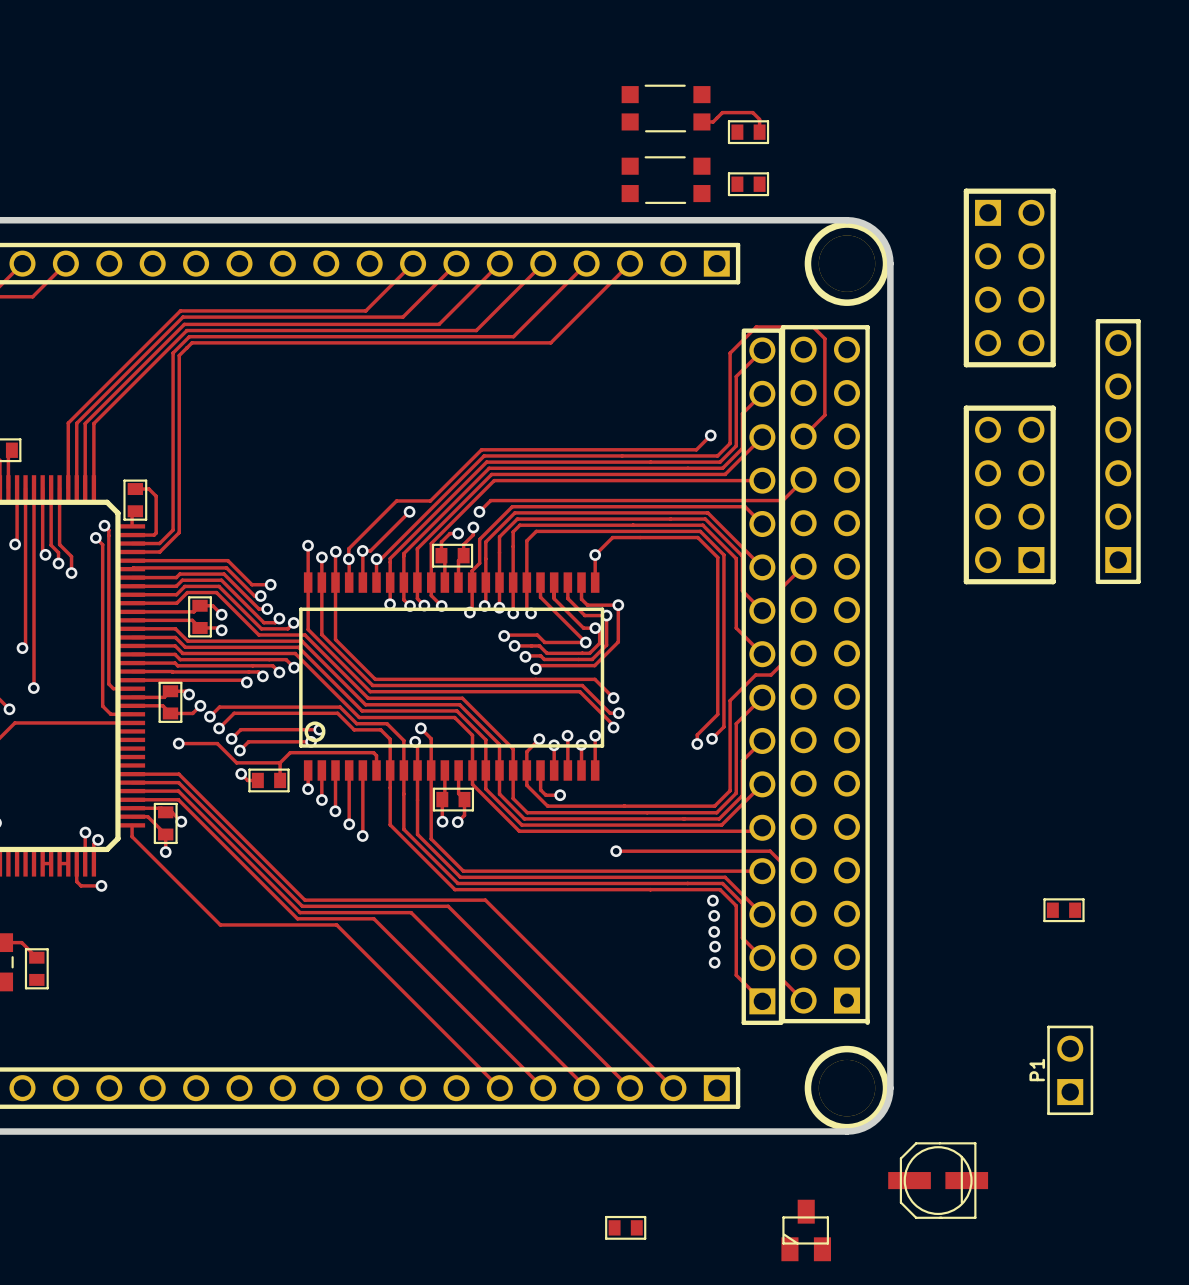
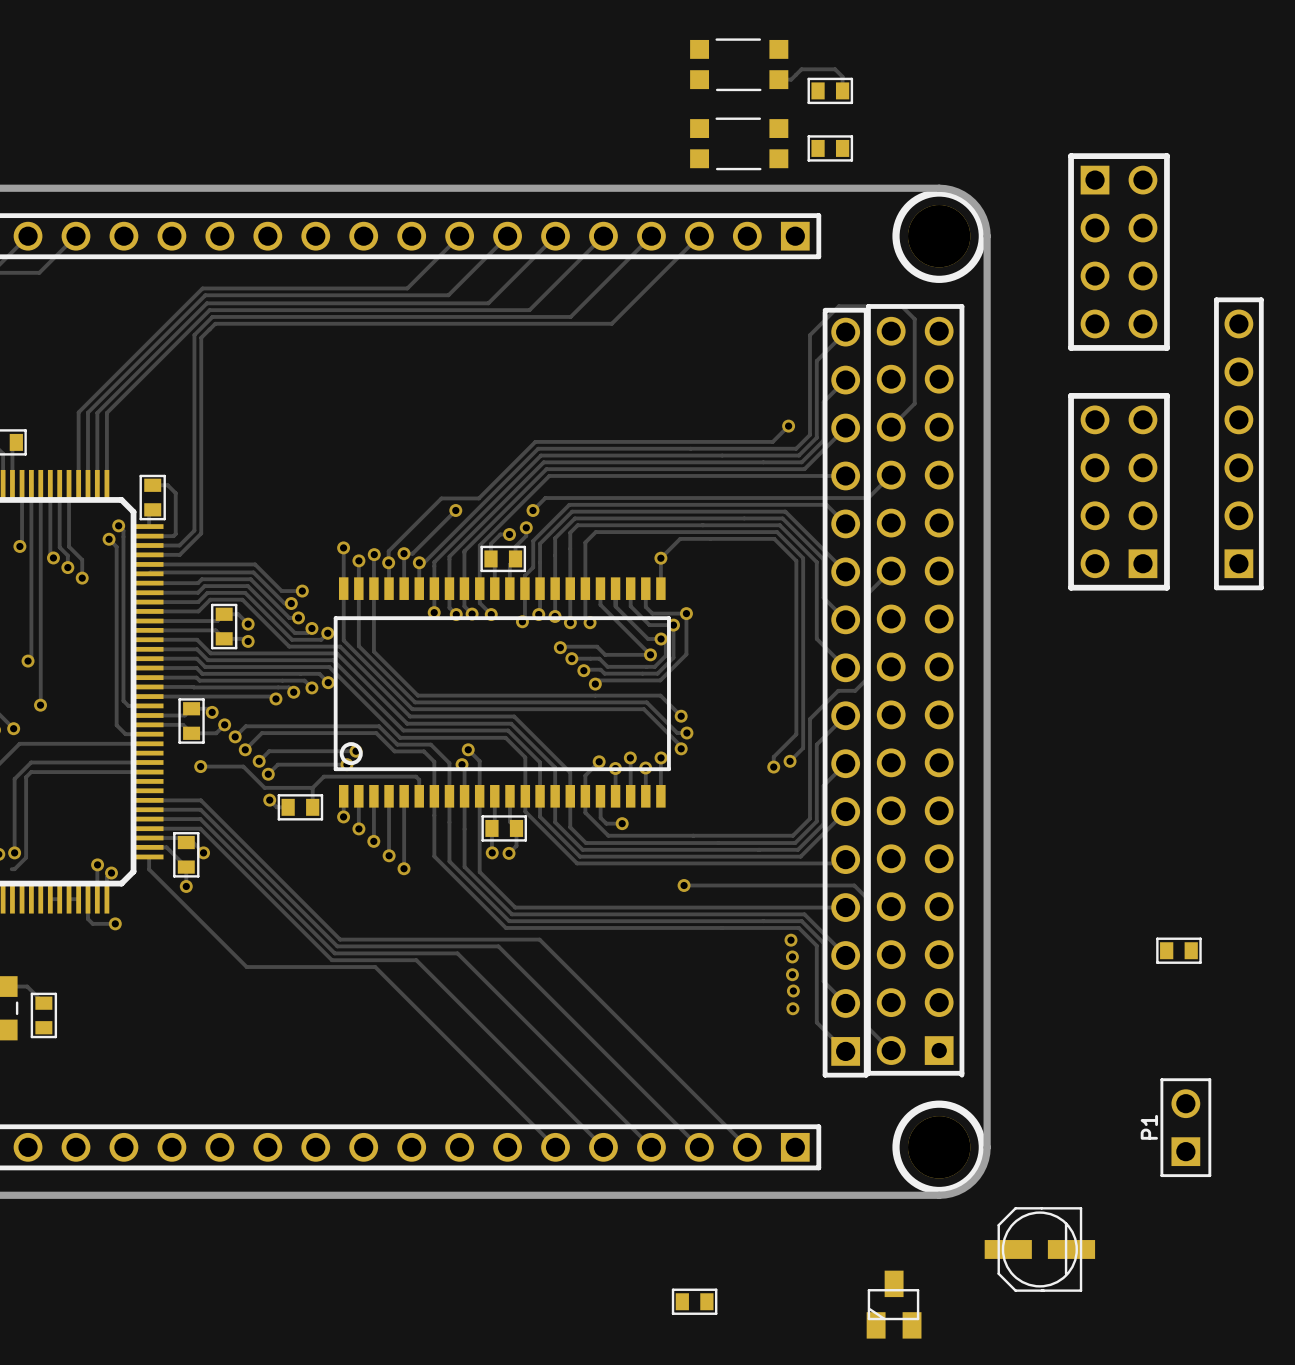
track: none -> (149, 762) (31, 762) (14, 779) (14, 852)
track: none -> (149, 772) (31, 772) (26, 777) (26, 857) (14, 869) (11, 869)
via: none -> (14, 852)

